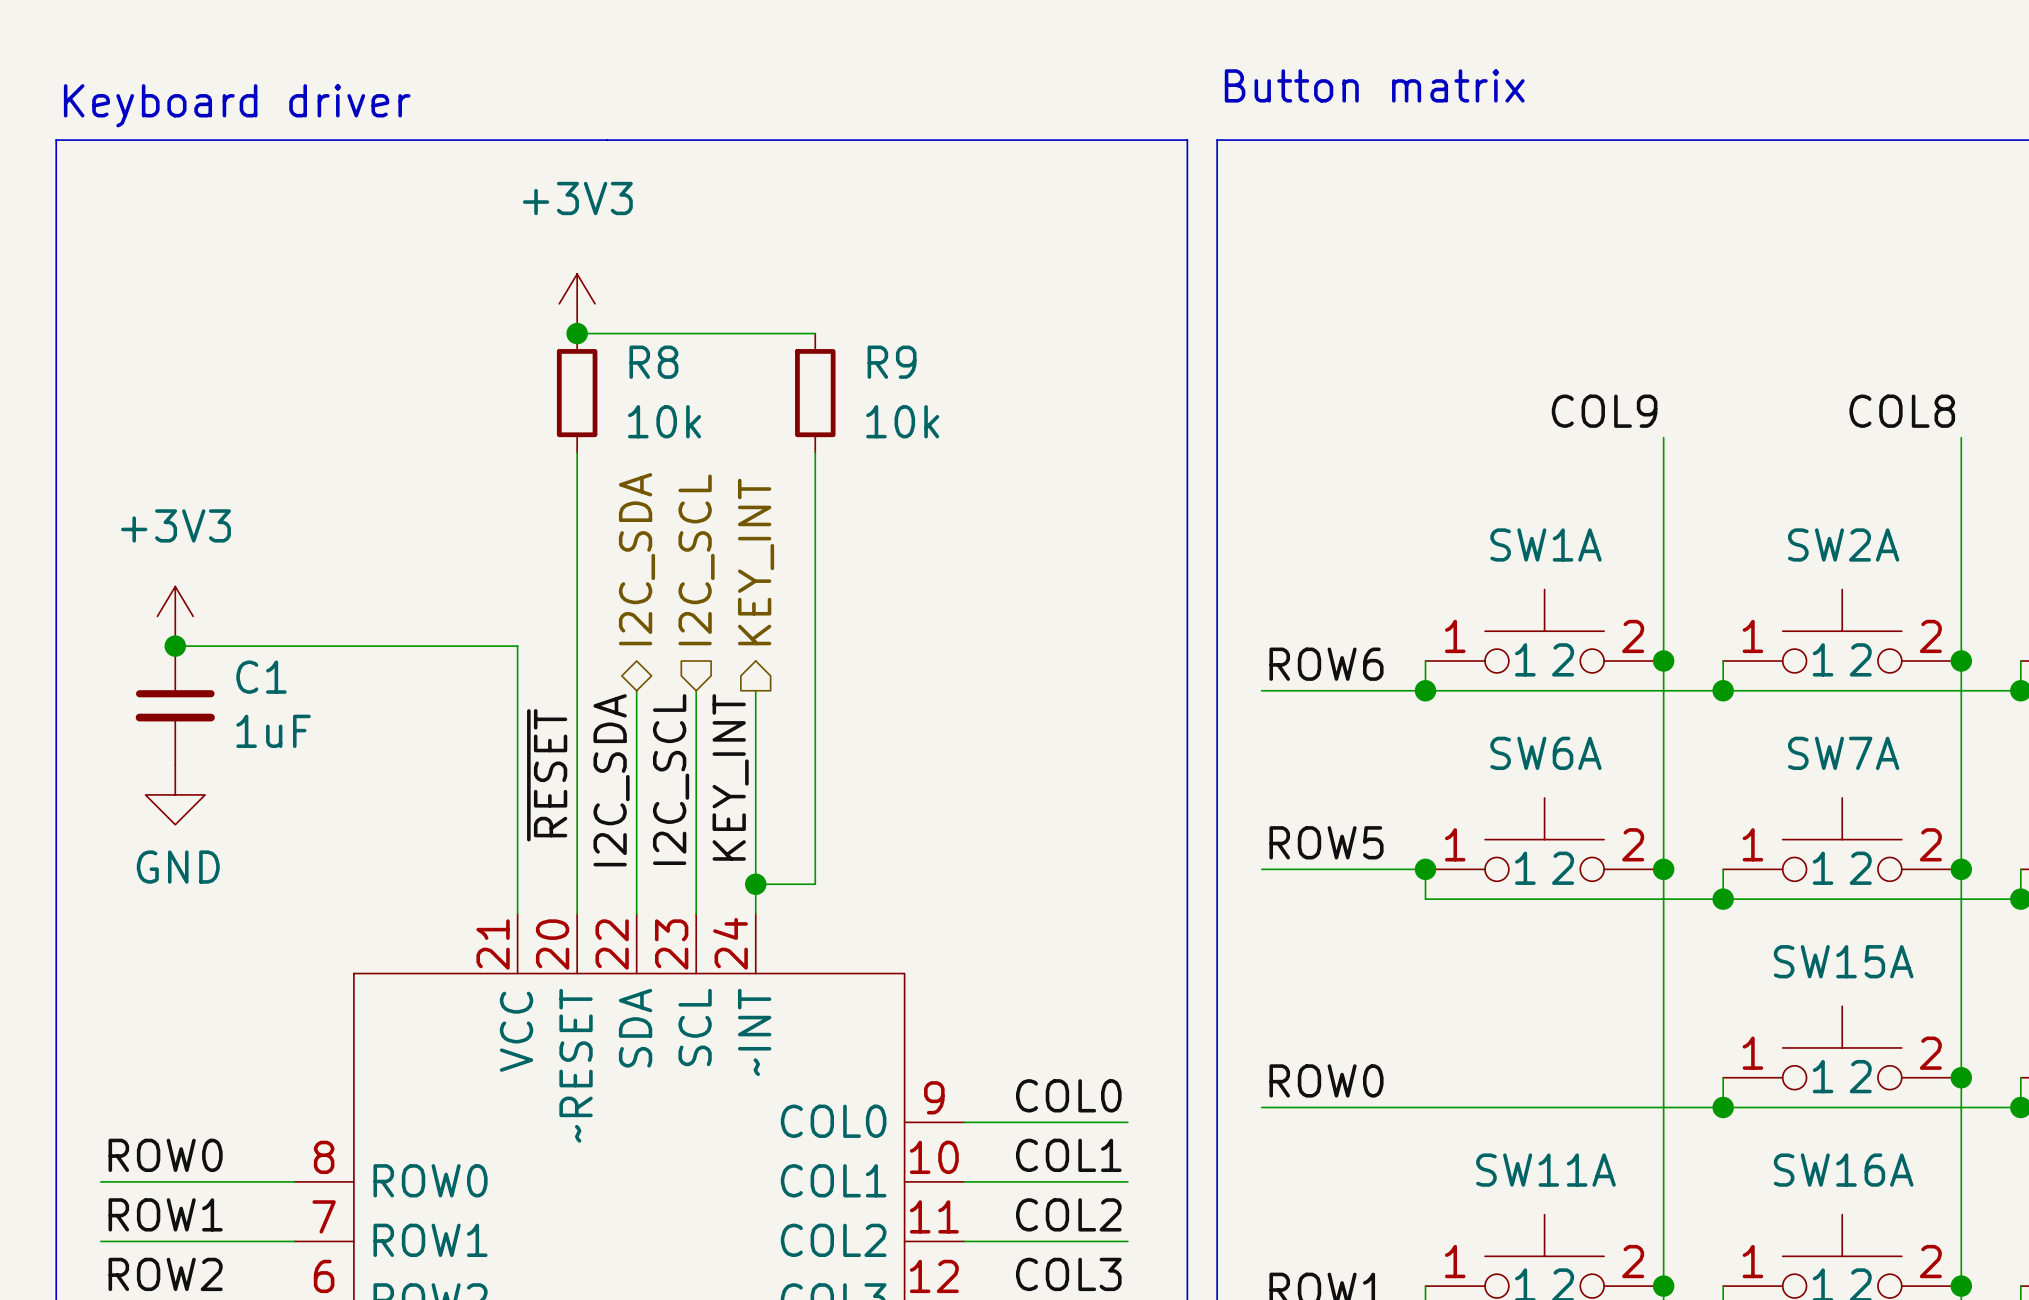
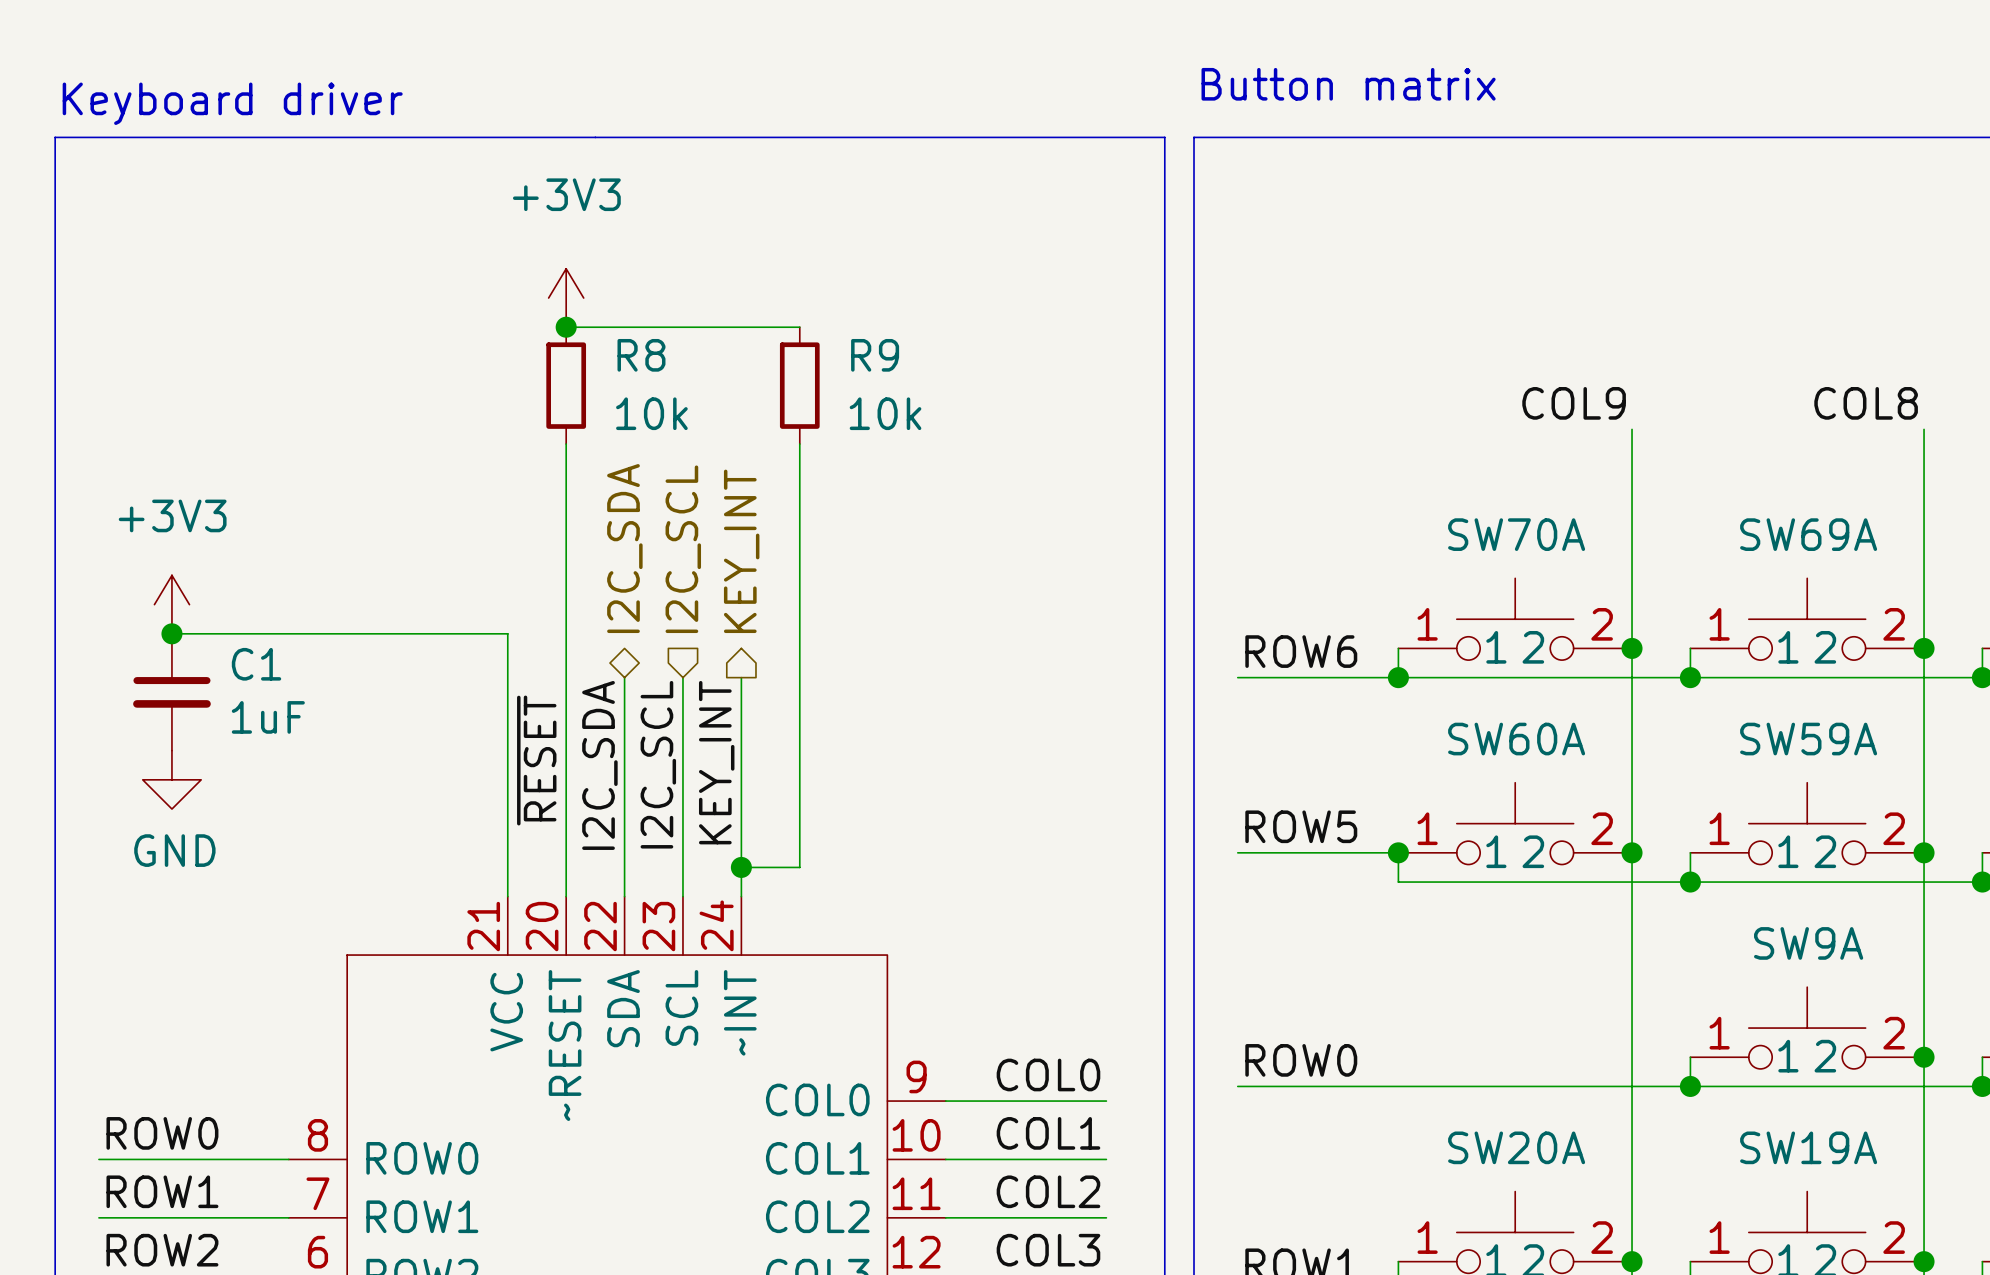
SW1A name: SW1A (1545, 544) -> SW70A (1516, 534)
SW2A name: SW2A (1843, 544) -> SW69A (1808, 534)
SW6A name: SW6A (1545, 753) -> SW60A (1516, 739)
SW7A name: SW7A (1843, 753) -> SW59A (1808, 739)
SW15A name: SW15A (1843, 961) -> SW9A (1808, 943)
SW11A name: SW11A (1545, 1170) -> SW20A (1516, 1147)
SW16A name: SW16A (1843, 1170) -> SW19A (1808, 1147)

